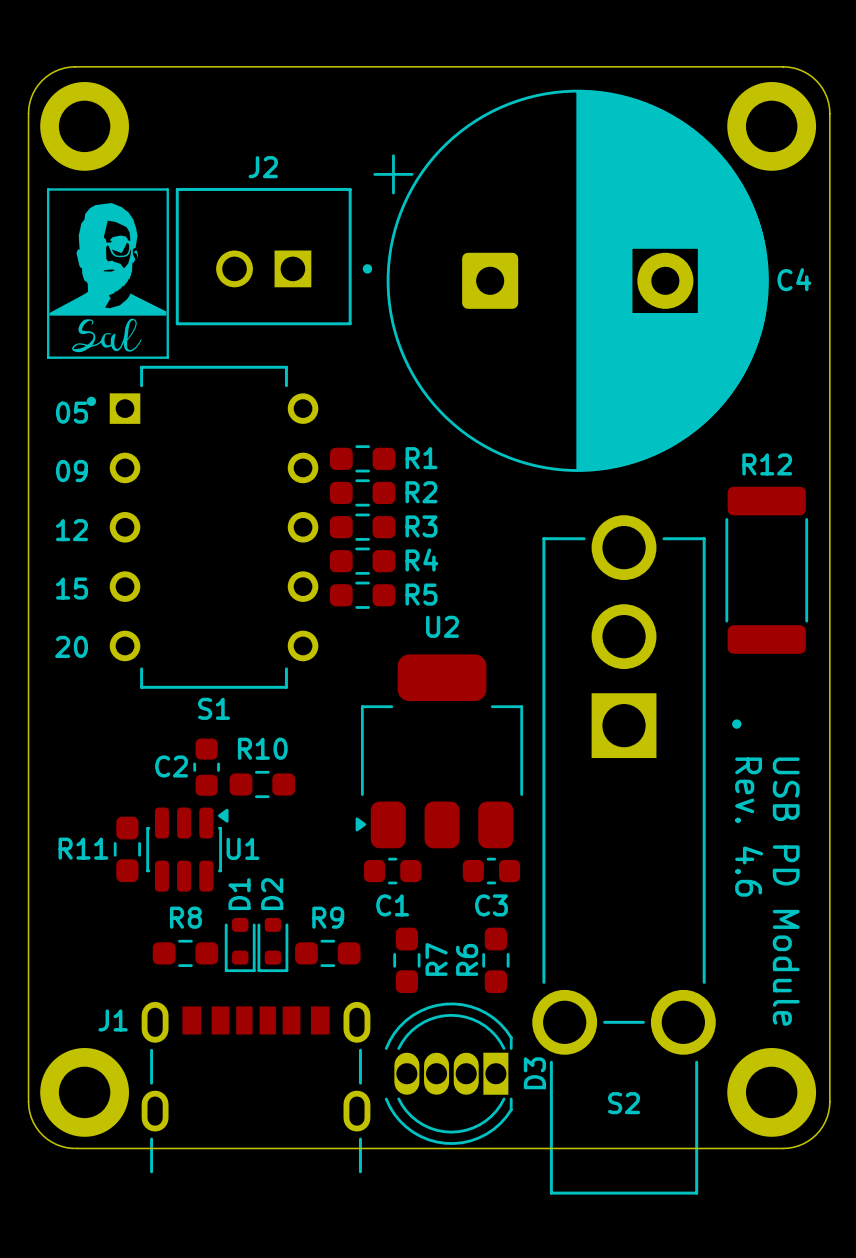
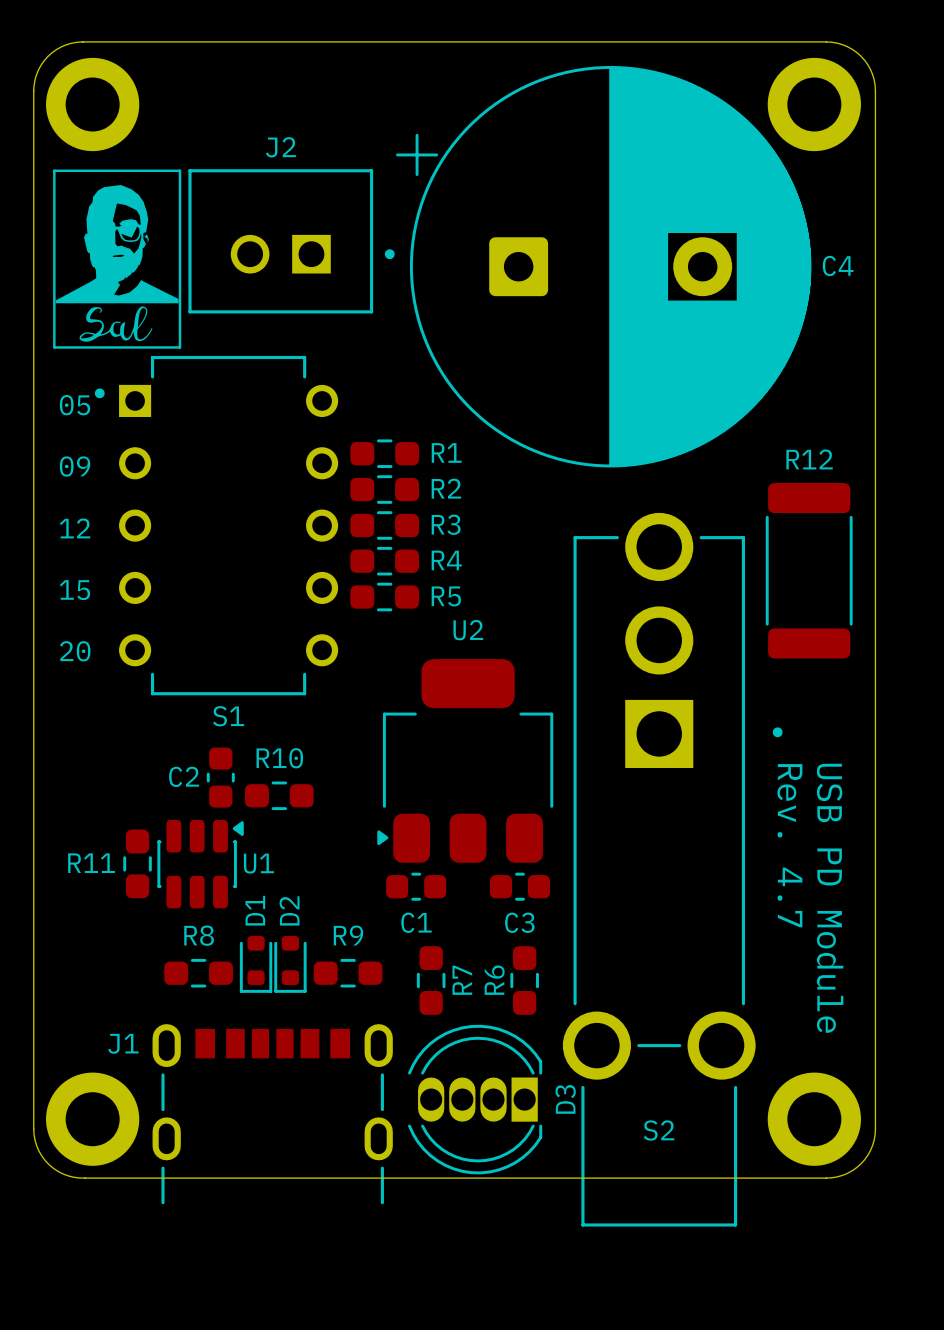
text: Rev. 4.6 (749, 827) -> Rev. 4.7 (789, 845)

